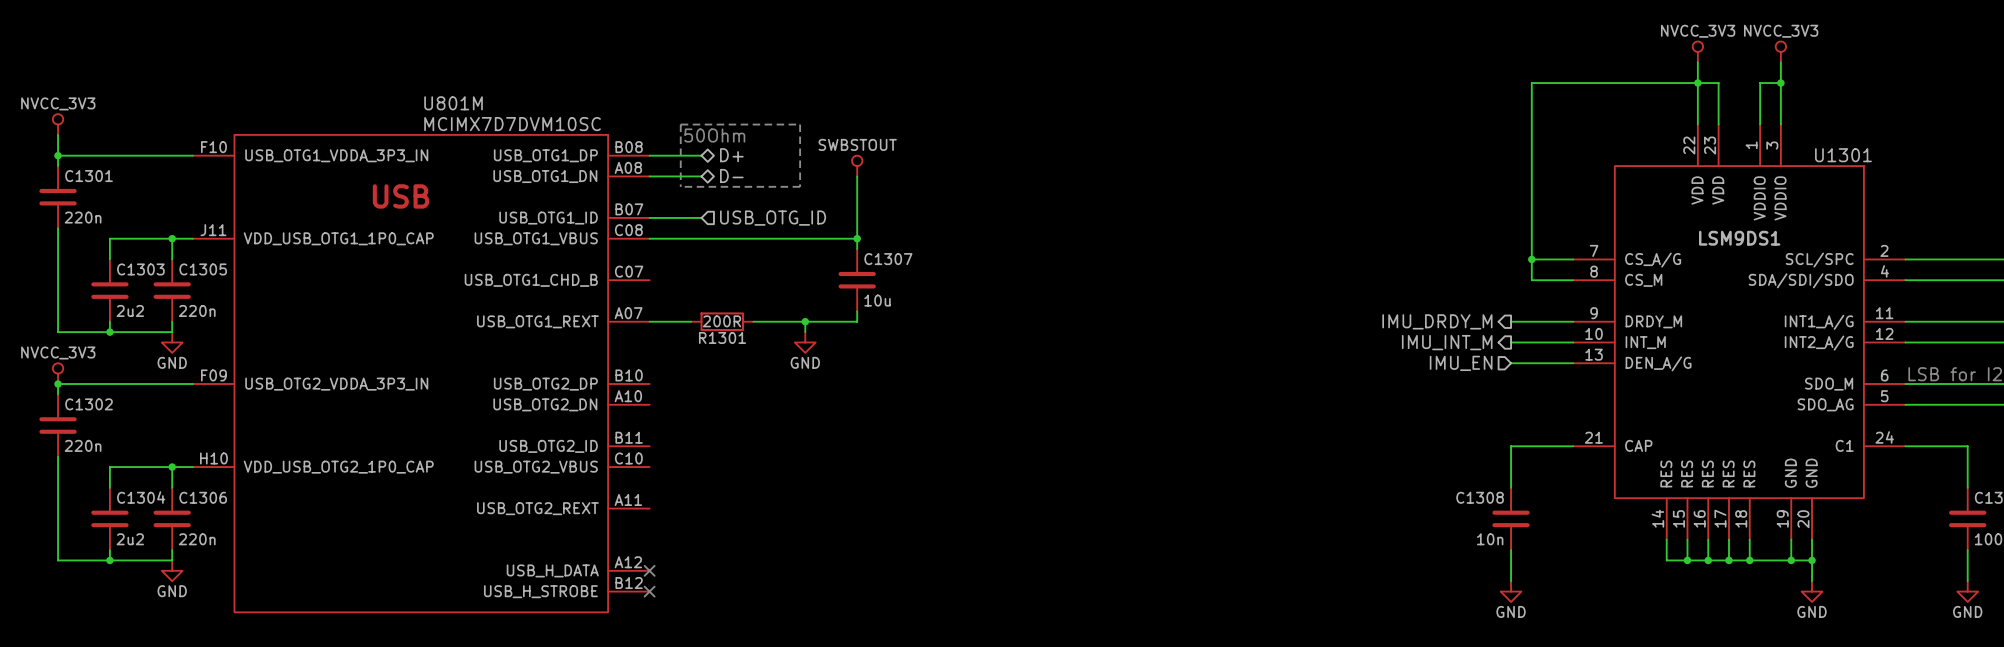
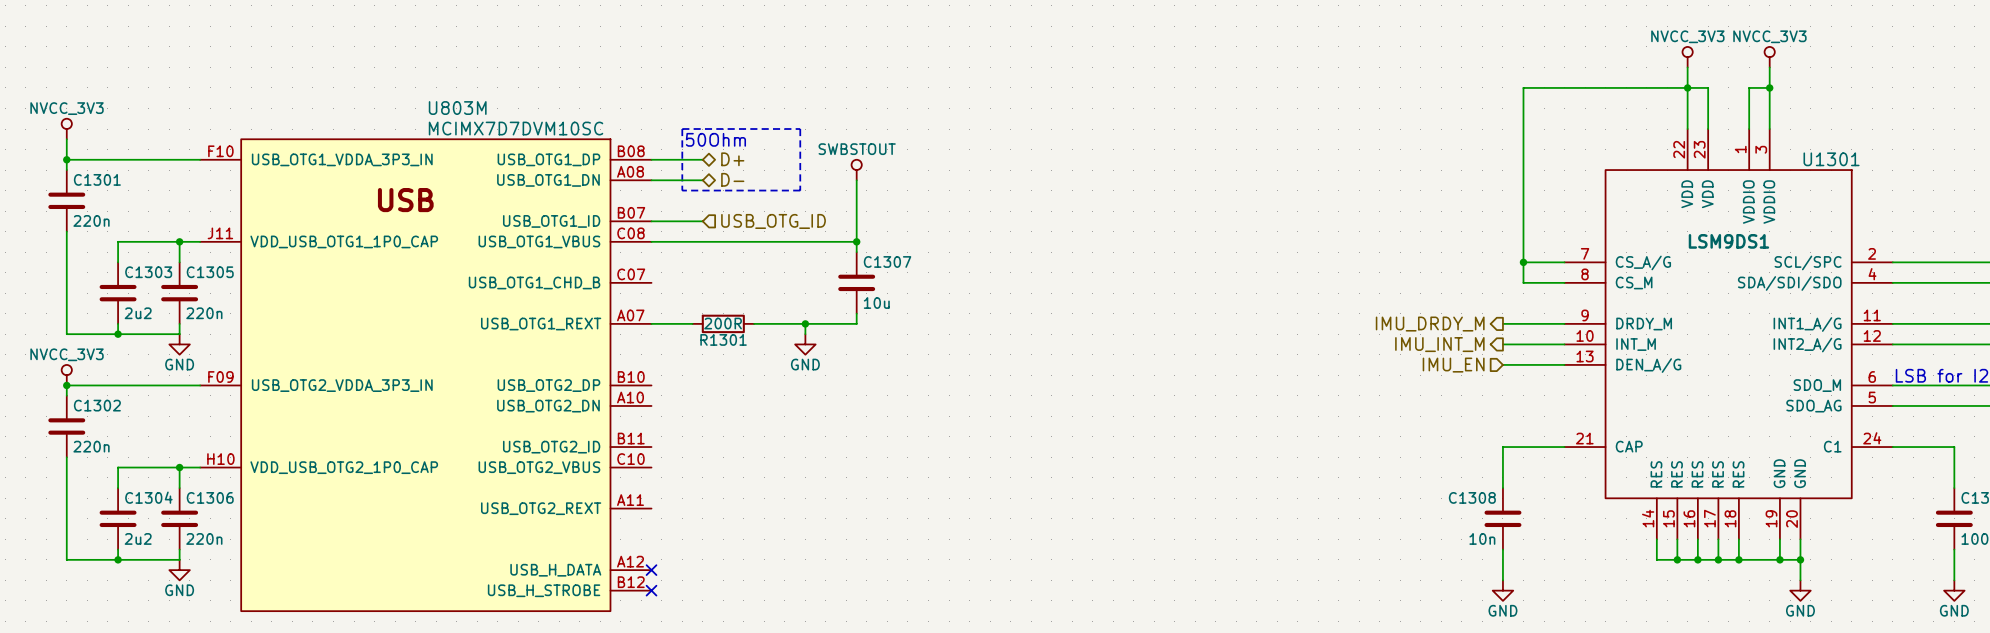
U801M name: U801M (453, 103) -> U803M (457, 108)

